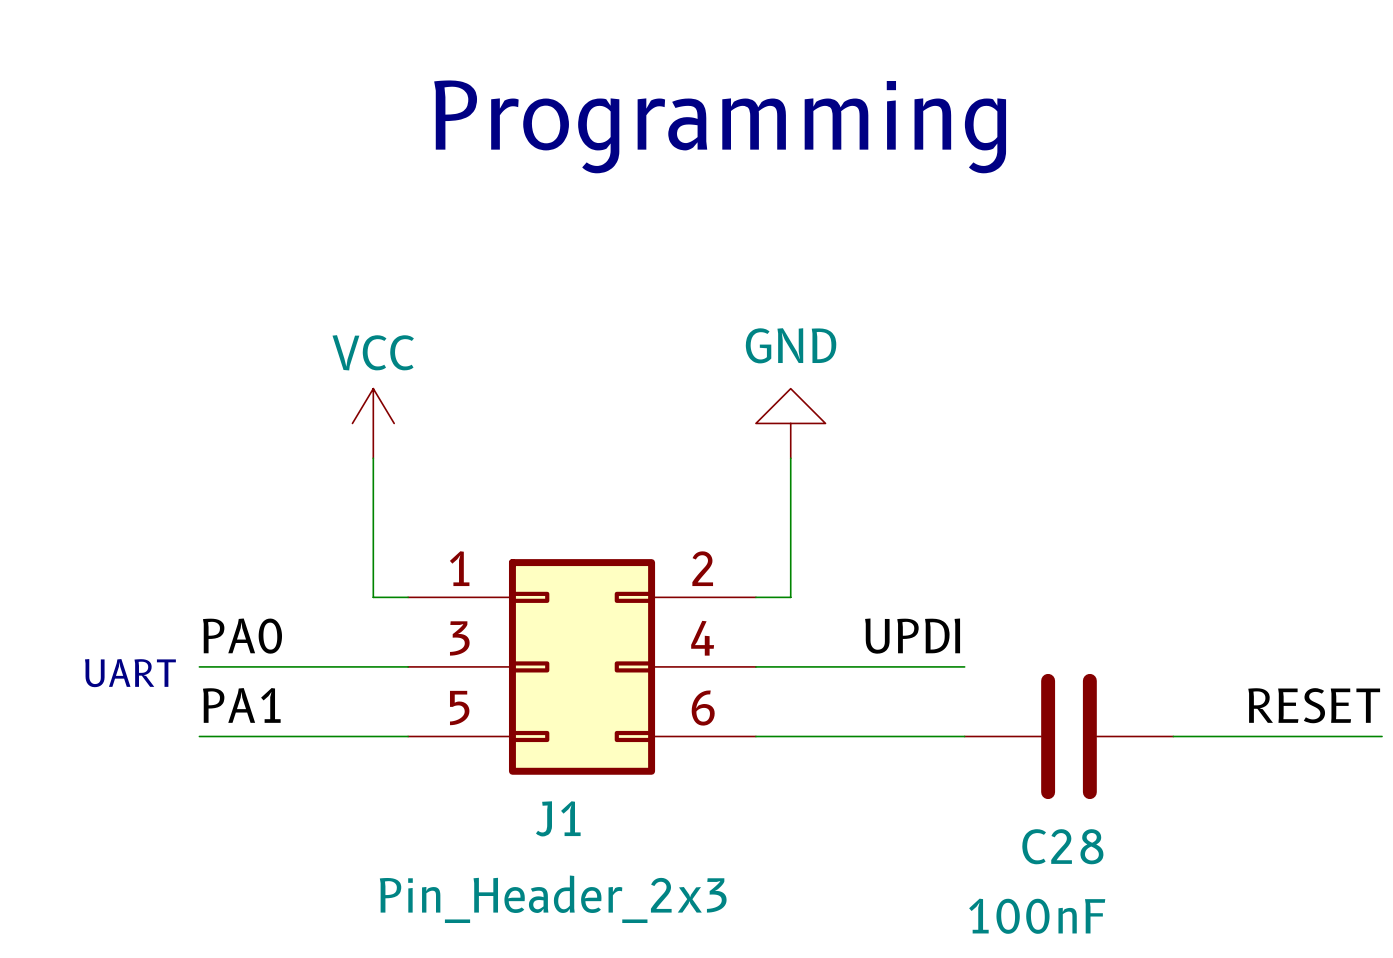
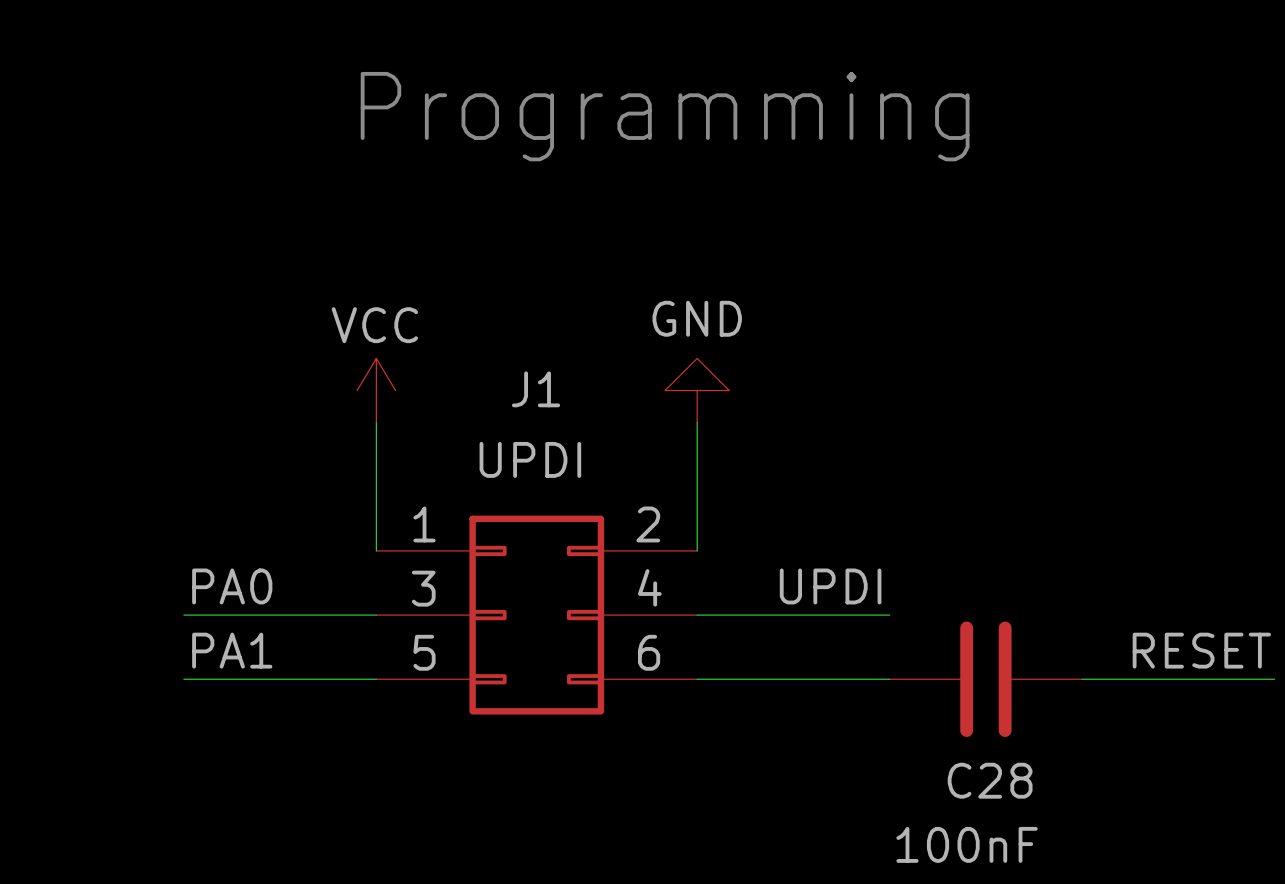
power symbol position: VCC (373, 423) -> VCC (376, 390)
power symbol position: GND (790, 423) -> GND (697, 390)
wire: (373, 458) (373, 597) (408, 597) -> (376, 422) (376, 550)
wire: (790, 458) (790, 597) (755, 597) -> (697, 422) (697, 550)
text: UART (130, 673) -> none
J1 name position: J1 (558, 818) -> J1 (536, 389)
J1 value: Pin_Header_2x3 (553, 899) -> UPDI (530, 459)

